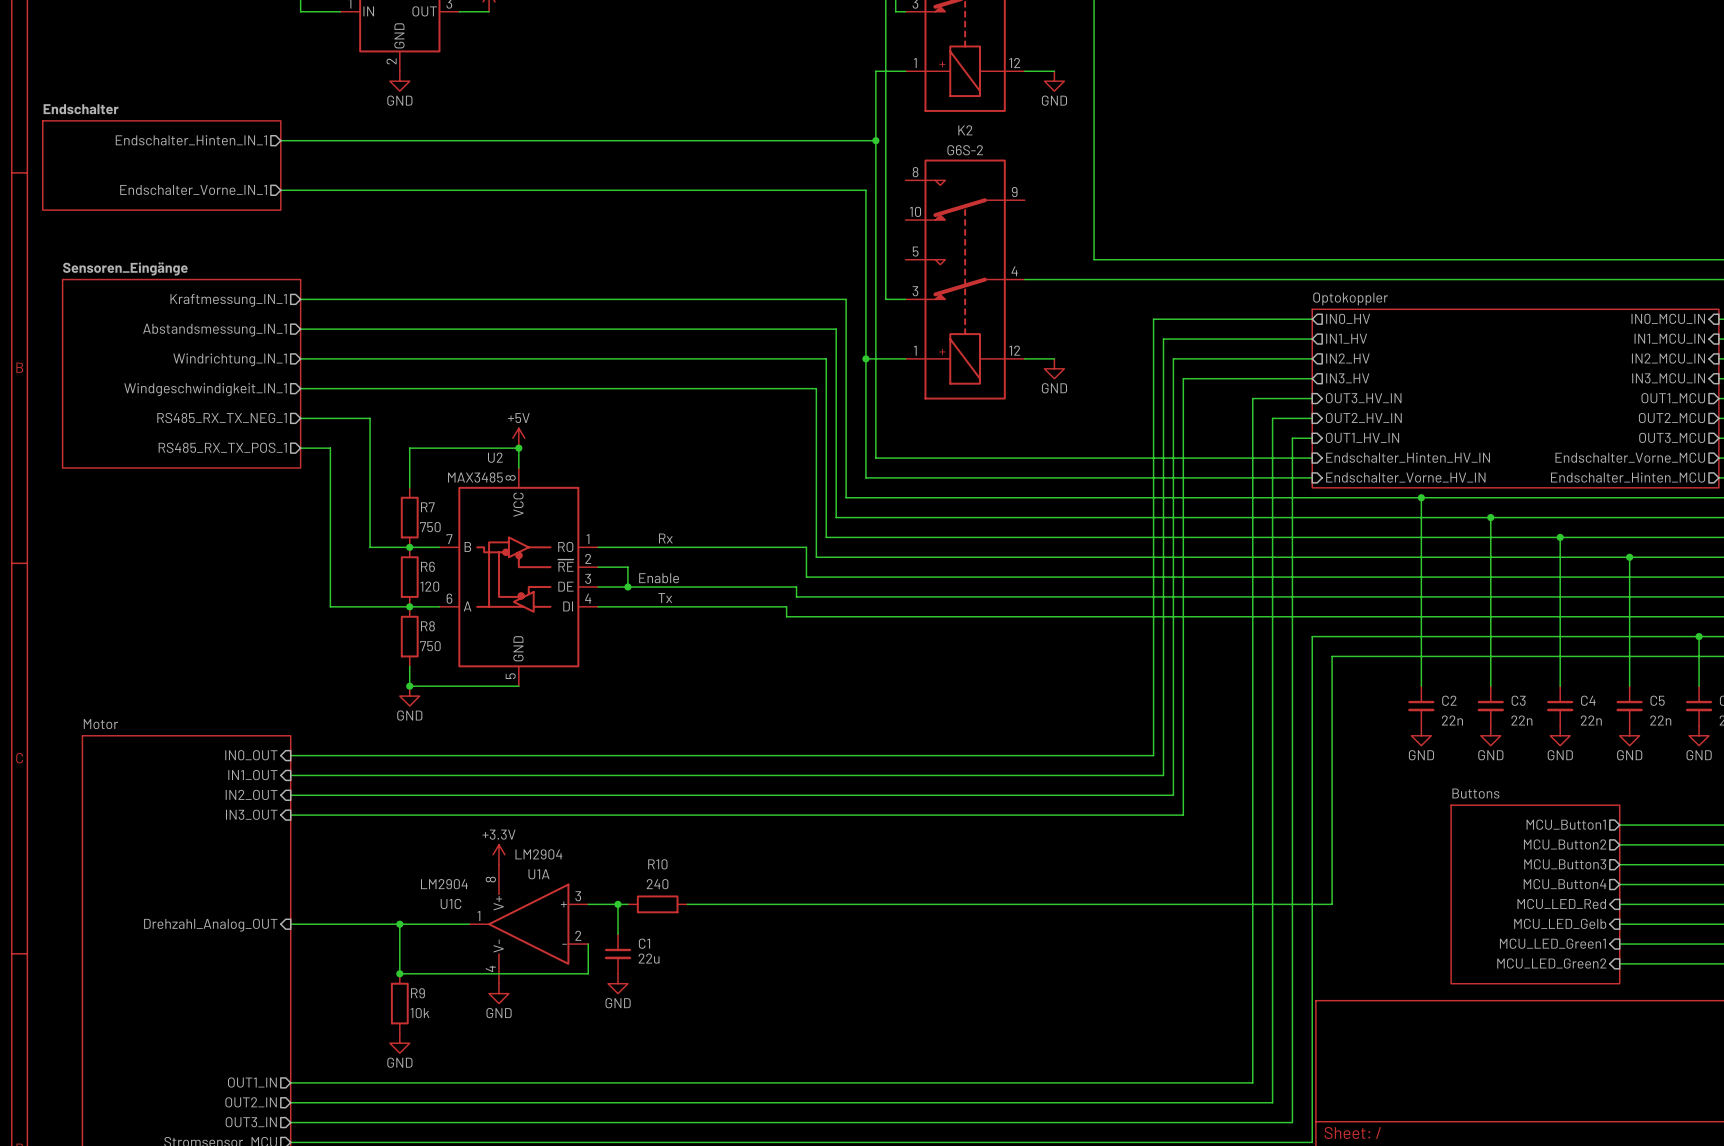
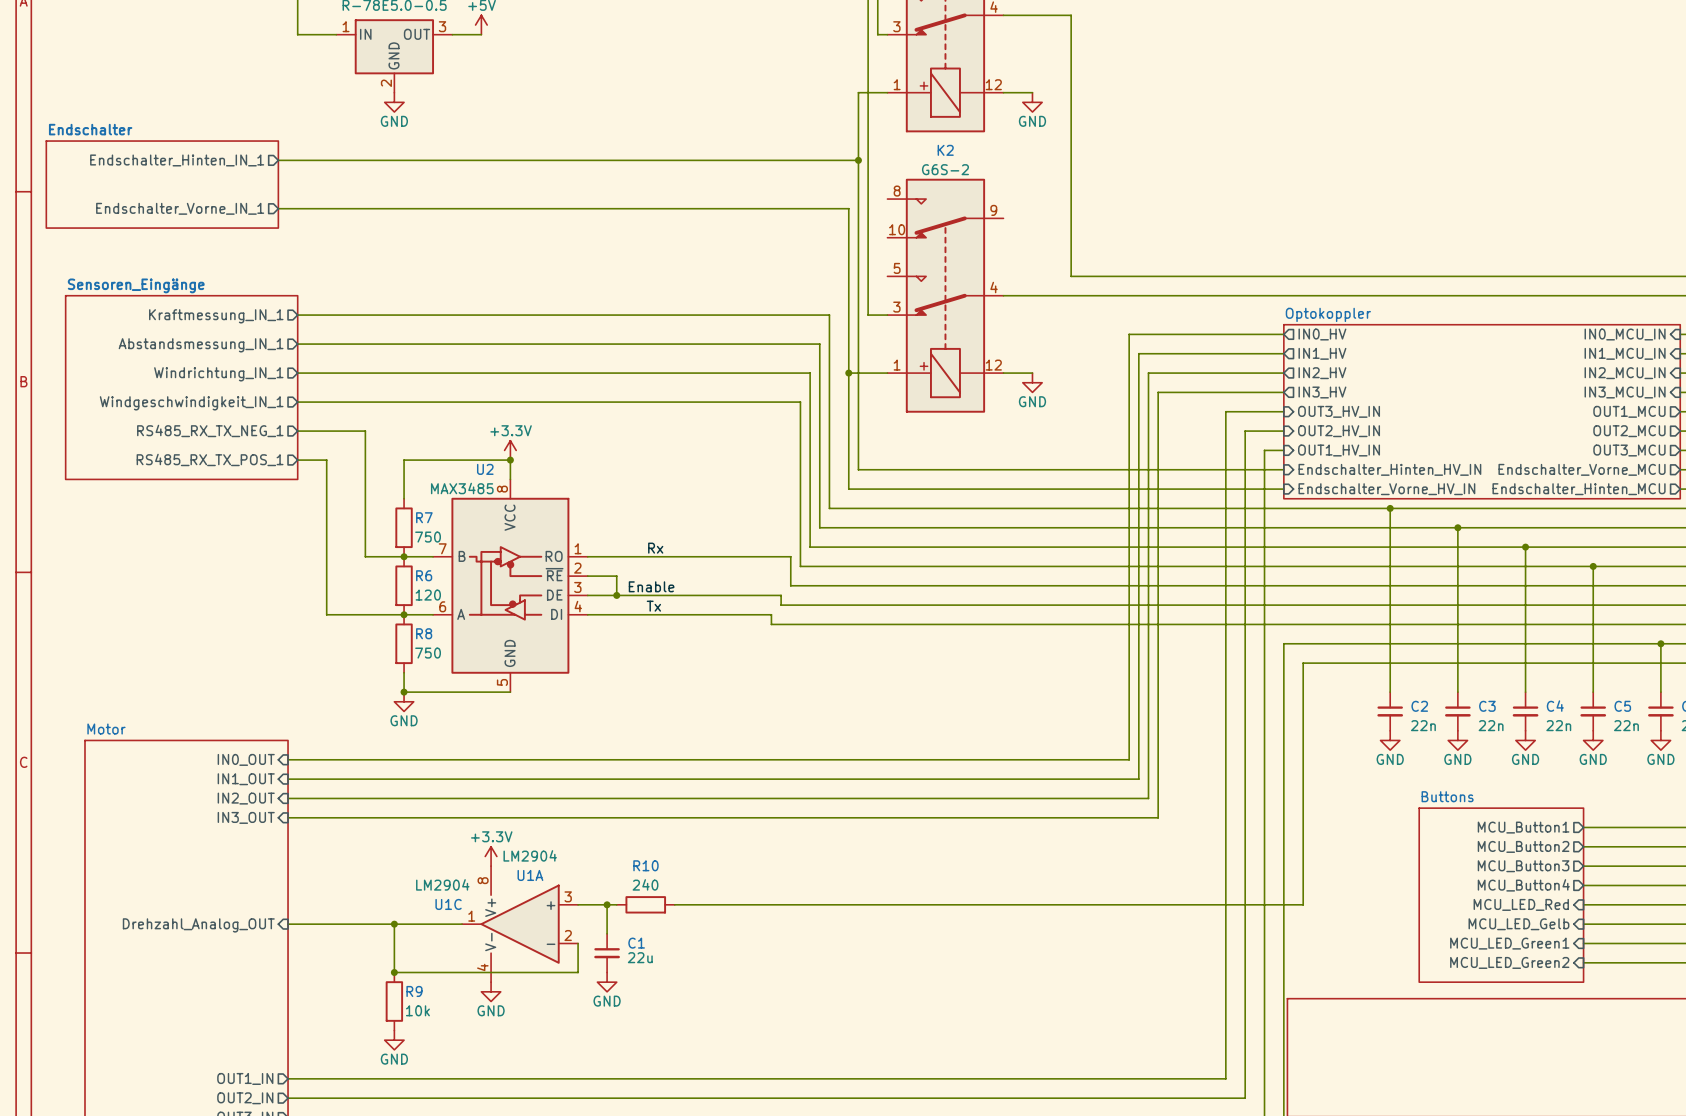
power symbol: +5V (518, 438) -> +3.3V (510, 450)

